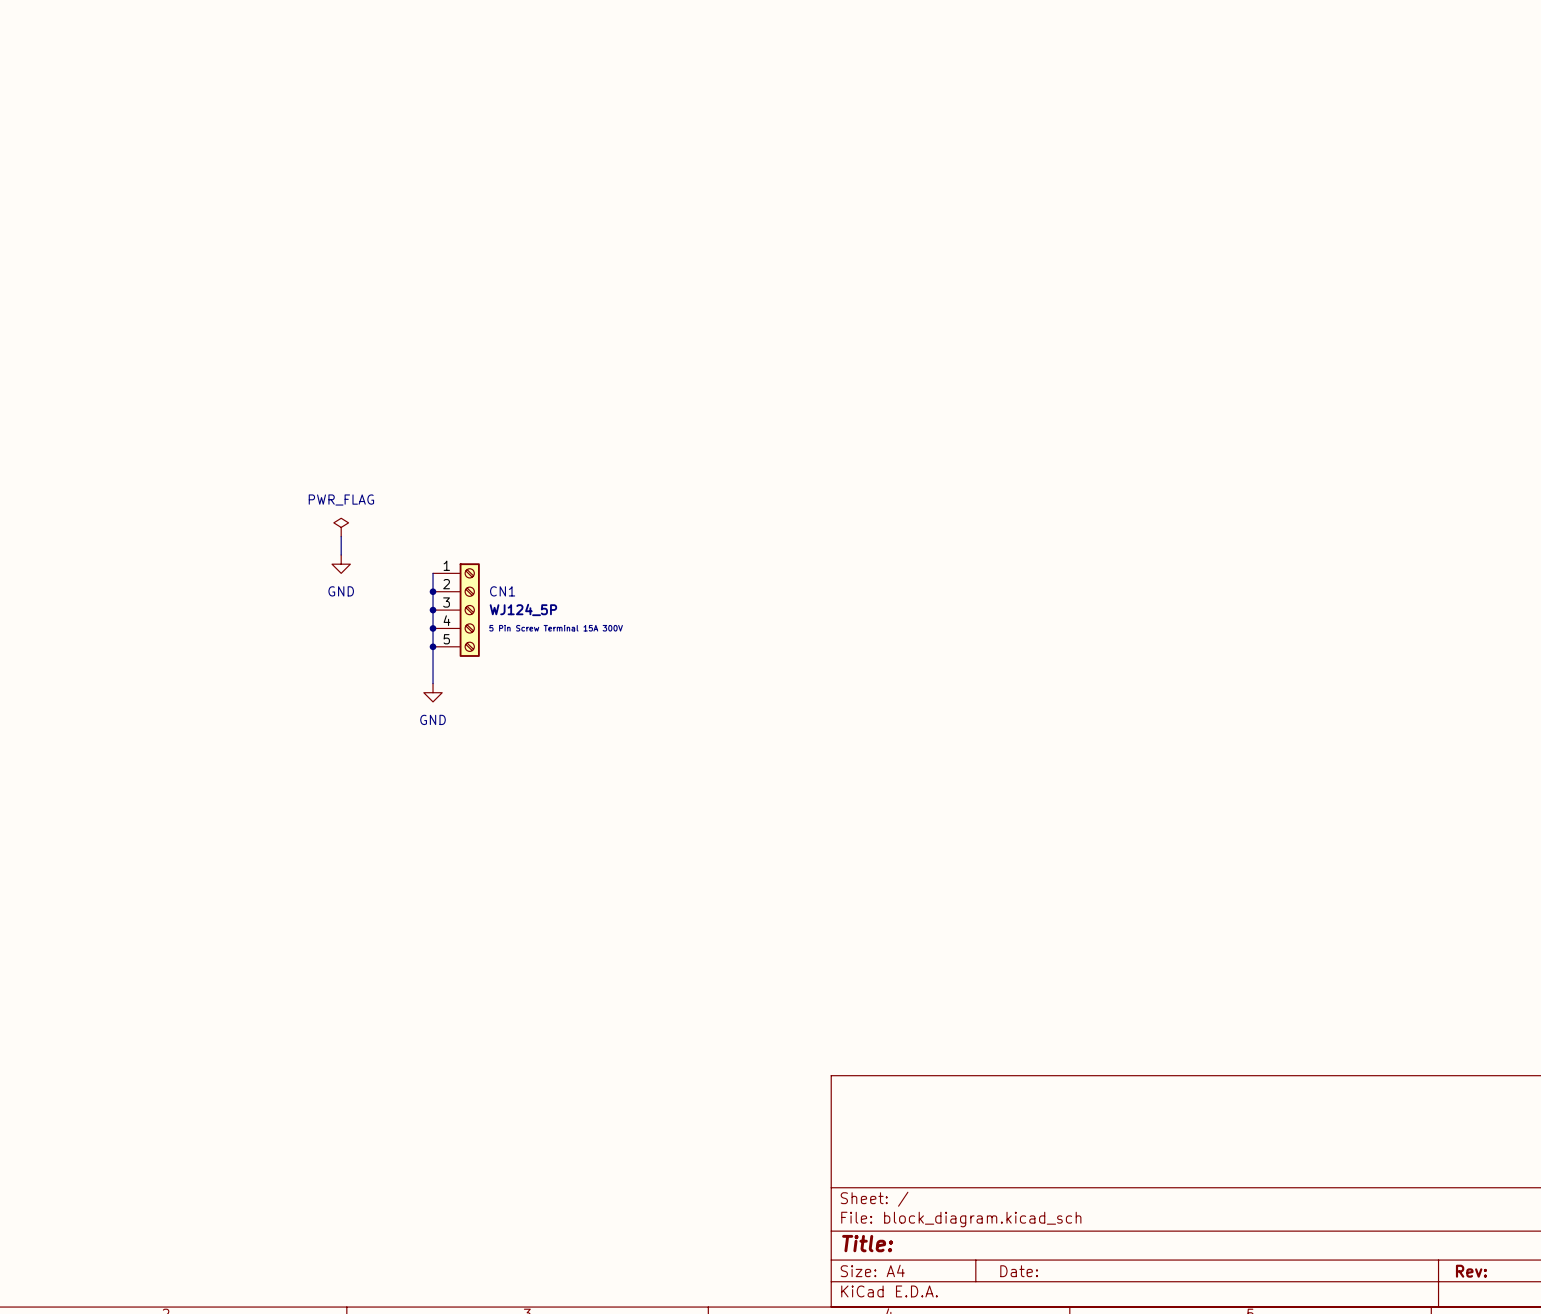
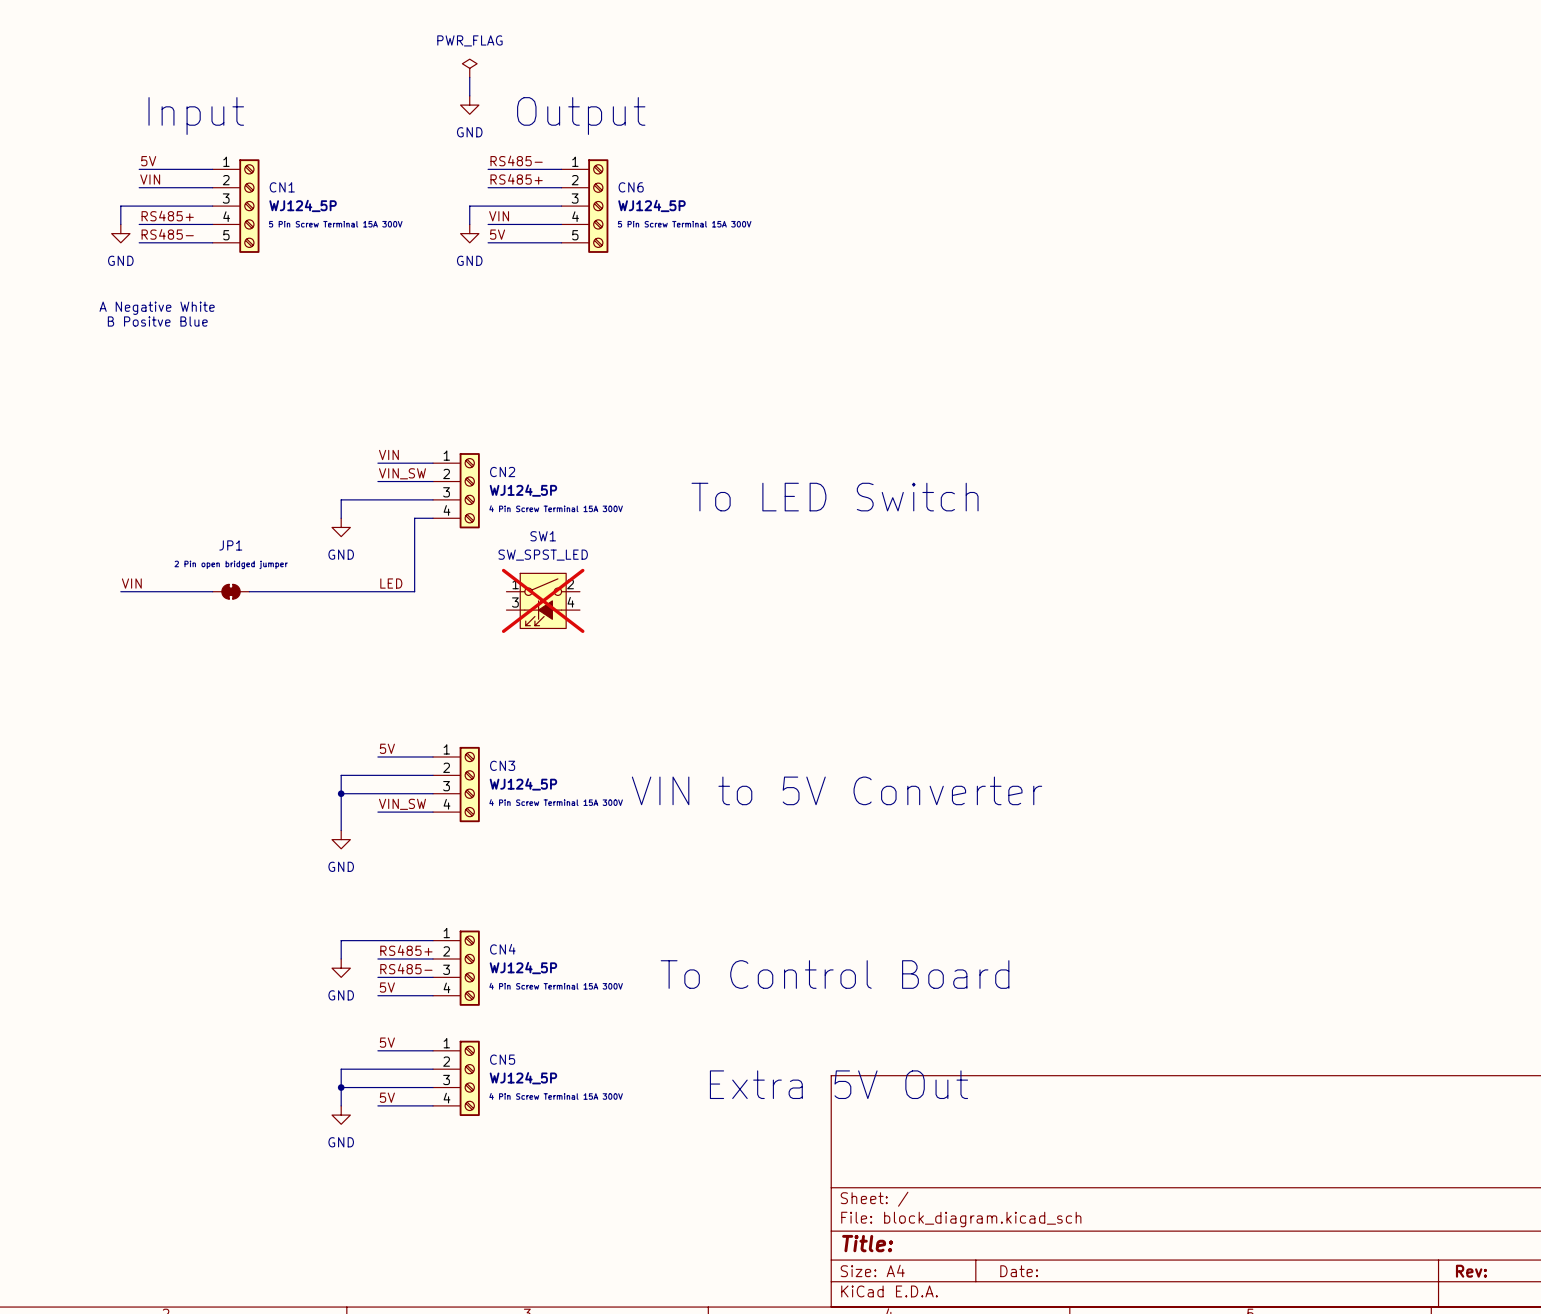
power symbol: none -> PWR_FLAG (469, 68)
wire: none -> (469, 77) (469, 95)
power symbol: none -> GND (469, 105)
text: none -> Input (196, 116)
text: none -> Output (581, 116)
label: none -> RS485- (516, 160)
label: none -> 5V (148, 161)
wire: none -> (139, 169) (212, 169)
wire: none -> (488, 169) (561, 169)
label: none -> VIN (150, 179)
label: none -> RS485+ (516, 179)
wire: none -> (139, 187) (212, 187)
wire: none -> (488, 187) (561, 187)
wire: none -> (212, 206) (120, 206) (120, 224)
wire: none -> (561, 206) (469, 206) (469, 224)
CN6: none -> WJ124_5P (584, 206)
label: none -> RS485+ (167, 216)
label: none -> VIN (499, 216)
wire: none -> (139, 224) (212, 224)
wire: none -> (488, 224) (561, 224)
power symbol: none -> GND (120, 233)
power symbol: none -> GND (469, 233)
label: none -> RS485- (167, 234)
label: none -> 5V (497, 234)
wire: none -> (139, 242) (212, 242)
wire: none -> (488, 242) (561, 242)
text: none -> A Negative White (157, 308)
text: none -> B Positve Blue (157, 321)
label: none -> VIN (388, 454)
wire: none -> (377, 463) (433, 463)
label: none -> VIN_SW (402, 473)
wire: none -> (377, 481) (433, 481)
CN2: none -> WJ124_5P (456, 490)
text: none -> To LED Switch (835, 497)
wire: none -> (433, 499) (341, 499) (341, 518)
wire: none -> (433, 518) (414, 518) (414, 591) (249, 591)
power symbol: PWR_FLAG (341, 527) -> GND (341, 527)
wire: (341, 536) (341, 554) -> none
power symbol: GND (341, 564) -> none
wire: (433, 573) (433, 683) -> none
label: none -> VIN (131, 583)
label: none -> LED (391, 583)
wire: none -> (120, 591) (212, 591)
JP1: none -> (231, 591)
junction: (433, 591) -> none
SW1: none -> SW_SPST_LED (543, 600)
junction: (433, 610) -> none
CN1 position: (456, 610) -> (236, 206)
junction: (433, 628) -> none
junction: (433, 646) -> none
power symbol: GND (433, 692) -> none
label: none -> 5V (387, 748)
wire: none -> (377, 756) (433, 756)
wire: none -> (433, 775) (341, 775) (341, 830)
CN3: none -> WJ124_5P (456, 784)
text: none -> VIN to 5V Converter (837, 790)
wire: none -> (341, 793) (433, 793)
junction: none -> (341, 793)
label: none -> VIN_SW (402, 804)
wire: none -> (377, 812) (433, 812)
power symbol: none -> GND (341, 839)
wire: none -> (433, 940) (341, 940) (341, 958)
label: none -> RS485+ (406, 950)
wire: none -> (377, 958) (433, 958)
power symbol: none -> GND (341, 968)
label: none -> RS485- (406, 968)
CN4: none -> WJ124_5P (456, 968)
text: none -> To Control Board (835, 974)
wire: none -> (377, 977) (433, 977)
label: none -> 5V (387, 987)
wire: none -> (377, 995) (433, 995)
label: none -> 5V (387, 1042)
wire: none -> (377, 1050) (433, 1050)
wire: none -> (433, 1069) (341, 1069) (341, 1105)
CN5: none -> WJ124_5P (456, 1078)
text: none -> Extra 5V Out (838, 1084)
wire: none -> (341, 1087) (433, 1087)
junction: none -> (341, 1087)
label: none -> 5V (387, 1097)
wire: none -> (377, 1105) (433, 1105)
power symbol: none -> GND (341, 1115)

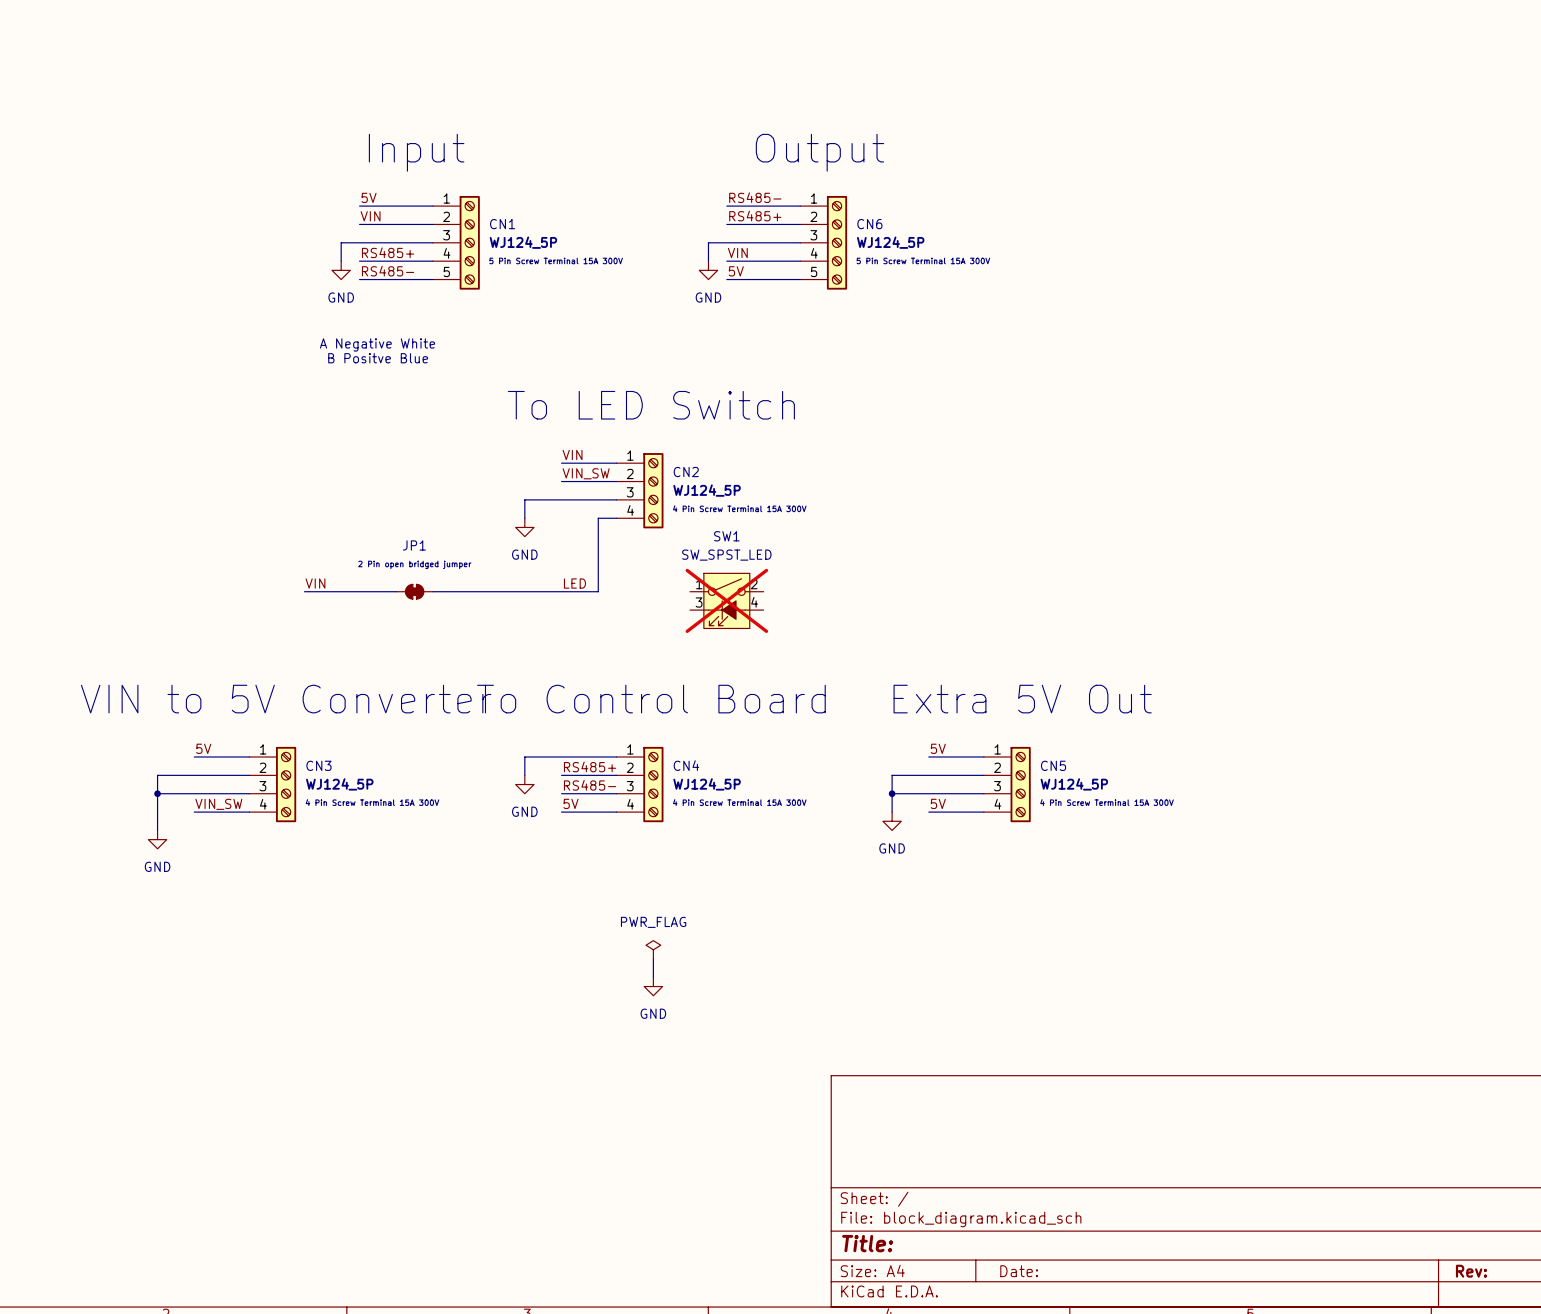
power symbol: PWR_FLAG (469, 68) -> none
wire: (469, 77) (469, 95) -> none
power symbol: GND (469, 105) -> none
text: Input (196, 116) -> none
text: Output (581, 116) -> none
text: none -> Input (416, 152)
text: none -> Output (819, 152)
label: RS485- (516, 160) -> none
label: 5V (148, 161) -> none
wire: (139, 169) (212, 169) -> none
wire: (488, 169) (561, 169) -> (359, 206) (433, 206)
label: VIN (150, 179) -> none
label: RS485+ (516, 179) -> none
wire: (139, 187) (212, 187) -> none
wire: (488, 187) (561, 187) -> (359, 224) (433, 224)
label: none -> 5V (369, 197)
label: none -> RS485- (755, 197)
wire: (212, 206) (120, 206) (120, 224) -> none
CN1 position: (236, 206) -> (456, 242)
wire: (561, 206) (469, 206) (469, 224) -> (433, 242) (341, 242) (341, 261)
CN6 position: (584, 206) -> (823, 242)
wire: none -> (726, 206) (800, 206)
label: RS485+ (167, 216) -> none
label: none -> VIN (370, 216)
label: VIN (499, 216) -> none
label: none -> RS485+ (755, 216)
wire: (139, 224) (212, 224) -> none
wire: (488, 224) (561, 224) -> (359, 261) (433, 261)
wire: none -> (726, 224) (800, 224)
power symbol: GND (120, 233) -> none
power symbol: GND (469, 233) -> none
label: RS485- (167, 234) -> none
label: 5V (497, 234) -> none
wire: (139, 242) (212, 242) -> none
wire: (488, 242) (561, 242) -> (359, 279) (433, 279)
wire: none -> (800, 242) (708, 242) (708, 261)
label: none -> RS485+ (388, 252)
label: none -> VIN (737, 252)
wire: none -> (726, 261) (800, 261)
power symbol: none -> GND (341, 270)
power symbol: none -> GND (708, 270)
label: none -> RS485- (388, 271)
label: none -> 5V (736, 271)
wire: none -> (726, 279) (800, 279)
text: A Negative White (157, 308) -> none
text: B Positve Blue (157, 321) -> none
text: none -> A Negative White (377, 344)
text: none -> B Positve Blue (378, 358)
text: none -> To LED Switch (651, 405)
label: VIN (388, 454) -> none
label: none -> VIN (572, 454)
wire: (377, 463) (433, 463) -> none
wire: none -> (561, 463) (616, 463)
label: VIN_SW (402, 473) -> none
label: none -> VIN_SW (586, 473)
wire: (377, 481) (433, 481) -> none
wire: none -> (561, 481) (616, 481)
CN2 position: (456, 490) -> (640, 490)
text: To LED Switch (835, 497) -> none
wire: (433, 499) (341, 499) (341, 518) -> none
wire: none -> (616, 499) (524, 499) (524, 518)
wire: (433, 518) (414, 518) (414, 591) (396, 591) -> none
wire: none -> (616, 518) (598, 518) (598, 591) (433, 591)
power symbol: GND (341, 527) -> none
power symbol: none -> GND (524, 527)
label: VIN (131, 583) -> none
label: none -> VIN (315, 583)
label: LED (391, 583) -> none
label: none -> LED (574, 583)
wire: (120, 591) (212, 591) -> none
JP1 position: (231, 591) -> (414, 591)
wire: (249, 591) (304, 591) -> (194, 756) (249, 756)
SW1 position: (543, 600) -> (726, 600)
text: none -> VIN to 5V Converter (286, 699)
text: none -> To Control Board (651, 699)
text: none -> Extra 5V Out (1022, 699)
label: none -> 5V (203, 748)
label: 5V (387, 748) -> none
label: none -> 5V (938, 748)
wire: (377, 756) (433, 756) -> none
wire: none -> (616, 756) (524, 756) (524, 775)
wire: none -> (928, 756) (983, 756)
label: none -> RS485+ (590, 766)
wire: none -> (249, 775) (157, 775) (157, 830)
wire: (433, 775) (341, 775) (341, 830) -> none
wire: none -> (561, 775) (616, 775)
wire: none -> (983, 775) (892, 775) (892, 812)
CN3 position: (456, 784) -> (272, 784)
power symbol: none -> GND (524, 784)
label: none -> RS485- (590, 785)
text: VIN to 5V Converter (837, 790) -> none
wire: none -> (157, 793) (249, 793)
junction: none -> (157, 793)
wire: (341, 793) (433, 793) -> none
junction: (341, 793) -> none
wire: none -> (561, 793) (616, 793)
wire: none -> (892, 793) (983, 793)
junction: none -> (892, 793)
label: none -> 5V (571, 803)
label: none -> 5V (938, 803)
label: none -> VIN_SW (218, 804)
label: VIN_SW (402, 804) -> none
wire: none -> (194, 812) (249, 812)
wire: (377, 812) (433, 812) -> none
wire: none -> (561, 812) (616, 812)
wire: none -> (928, 812) (983, 812)
power symbol: none -> GND (892, 821)
power symbol: none -> GND (157, 839)
power symbol: GND (341, 839) -> none
wire: (433, 940) (341, 940) (341, 958) -> none
power symbol: none -> PWR_FLAG (653, 949)
label: RS485+ (406, 950) -> none
wire: (377, 958) (433, 958) -> none
wire: none -> (653, 958) (653, 977)
power symbol: GND (341, 968) -> none
label: RS485- (406, 968) -> none
CN4 position: (456, 968) -> (640, 784)
text: To Control Board (835, 974) -> none
wire: (377, 977) (433, 977) -> none
power symbol: none -> GND (653, 986)
label: 5V (387, 987) -> none
wire: (377, 995) (433, 995) -> none
label: 5V (387, 1042) -> none
wire: (377, 1050) (433, 1050) -> none
wire: (433, 1069) (341, 1069) (341, 1105) -> none
CN5 position: (456, 1078) -> (1007, 784)
text: Extra 5V Out (838, 1084) -> none
wire: (341, 1087) (433, 1087) -> none
junction: (341, 1087) -> none
label: 5V (387, 1097) -> none
wire: (377, 1105) (433, 1105) -> none
power symbol: GND (341, 1115) -> none

